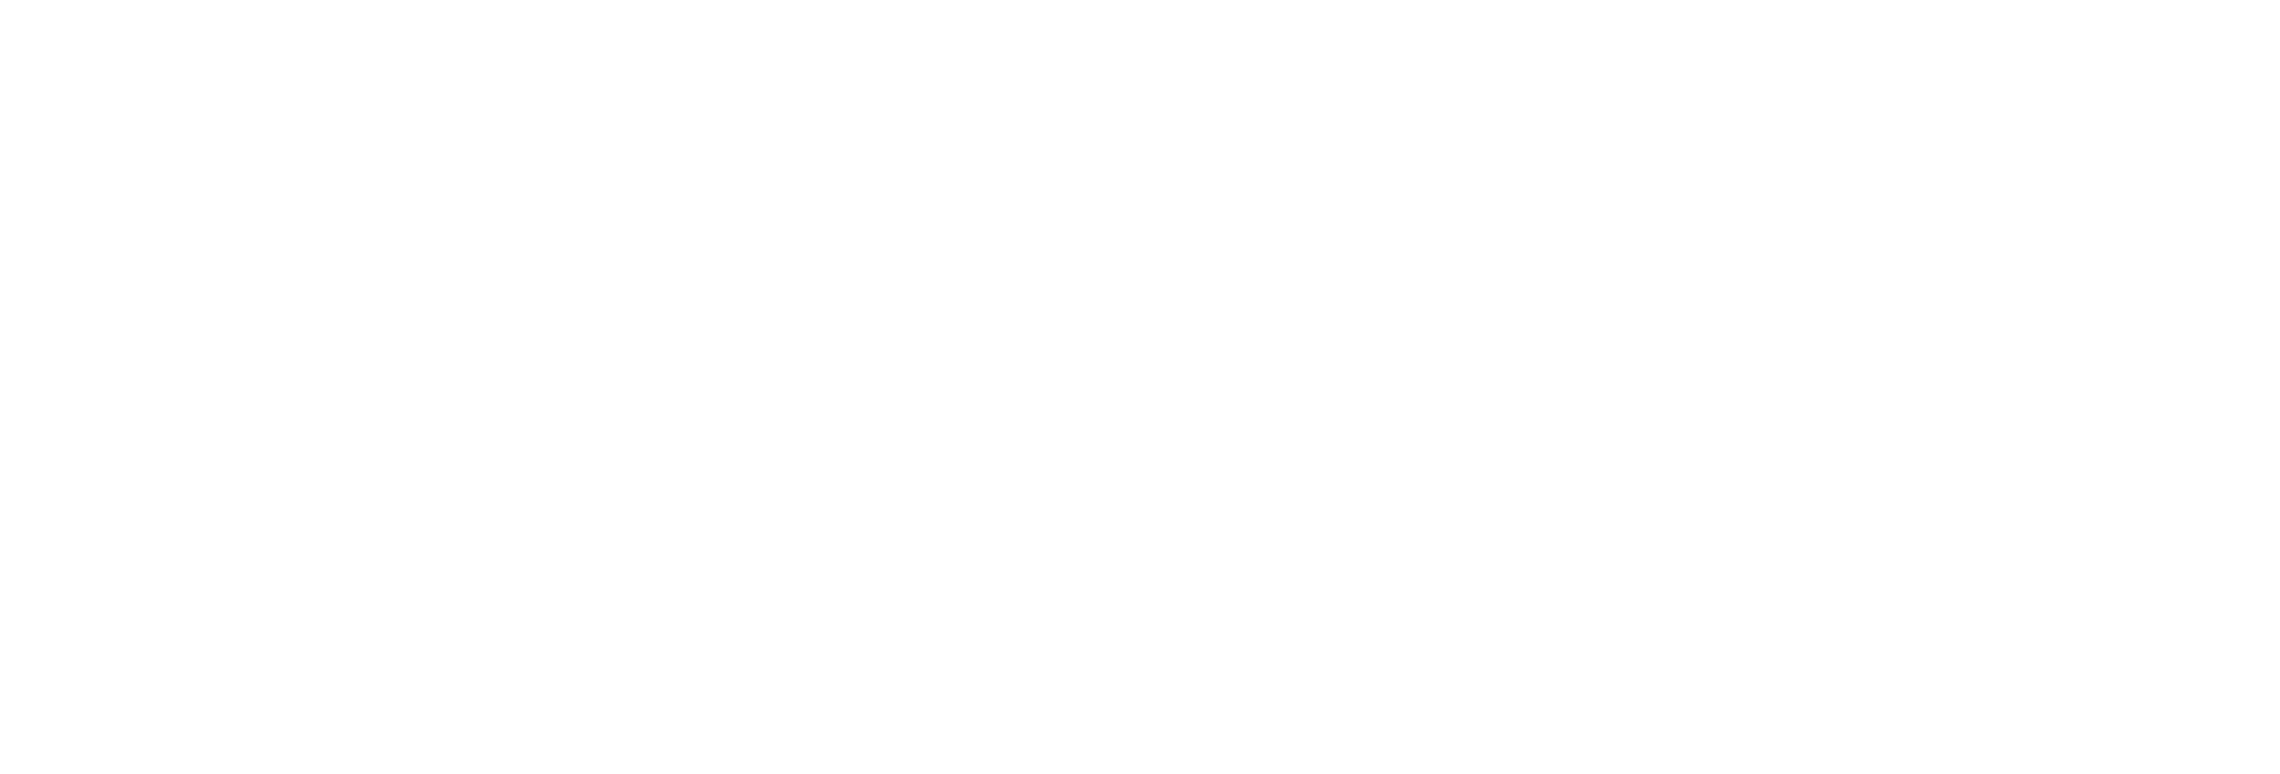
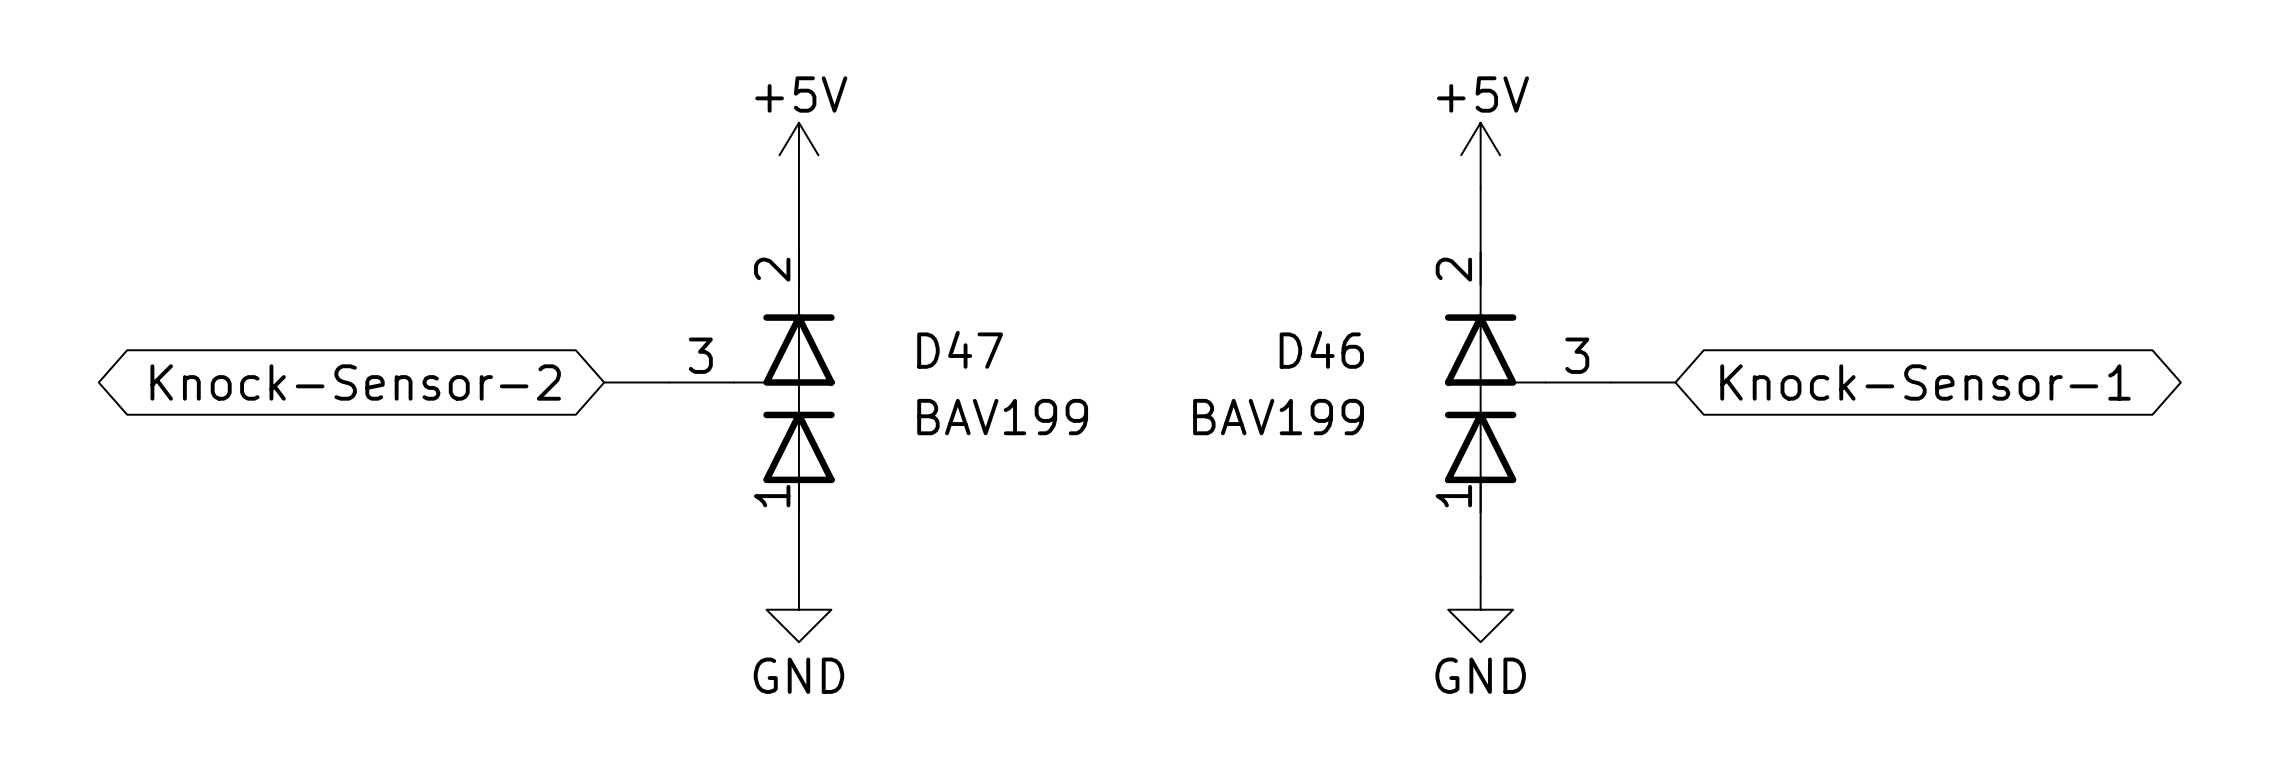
power symbol: none -> +5V (798, 155)
power symbol: none -> +5V (1480, 155)
wire: none -> (798, 187) (798, 252)
wire: none -> (1480, 187) (1480, 252)
global label: none -> Knock-Sensor-2 (355, 382)
wire: none -> (604, 382) (669, 382)
D47: none -> BAV199 (751, 382)
D46: none -> BAV199 (1527, 382)
wire: none -> (1610, 382) (1675, 382)
global label: none -> Knock-Sensor-1 (1925, 382)
wire: none -> (798, 512) (798, 577)
wire: none -> (1480, 512) (1480, 577)
power symbol: none -> GND (798, 609)
power symbol: none -> GND (1480, 609)

